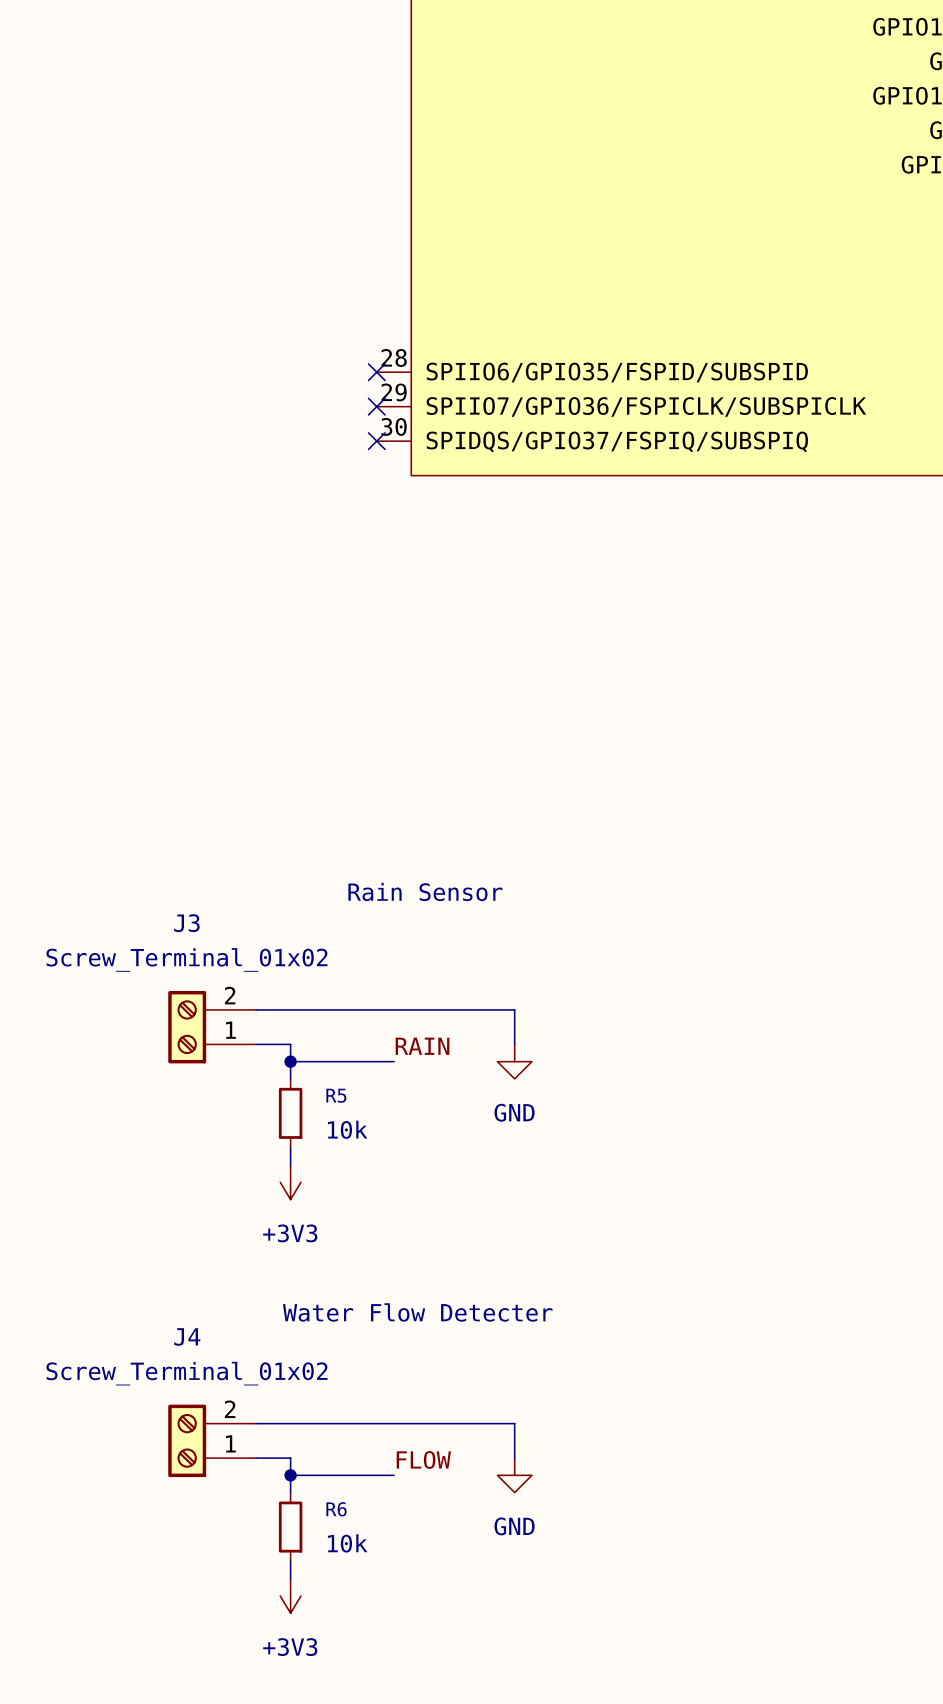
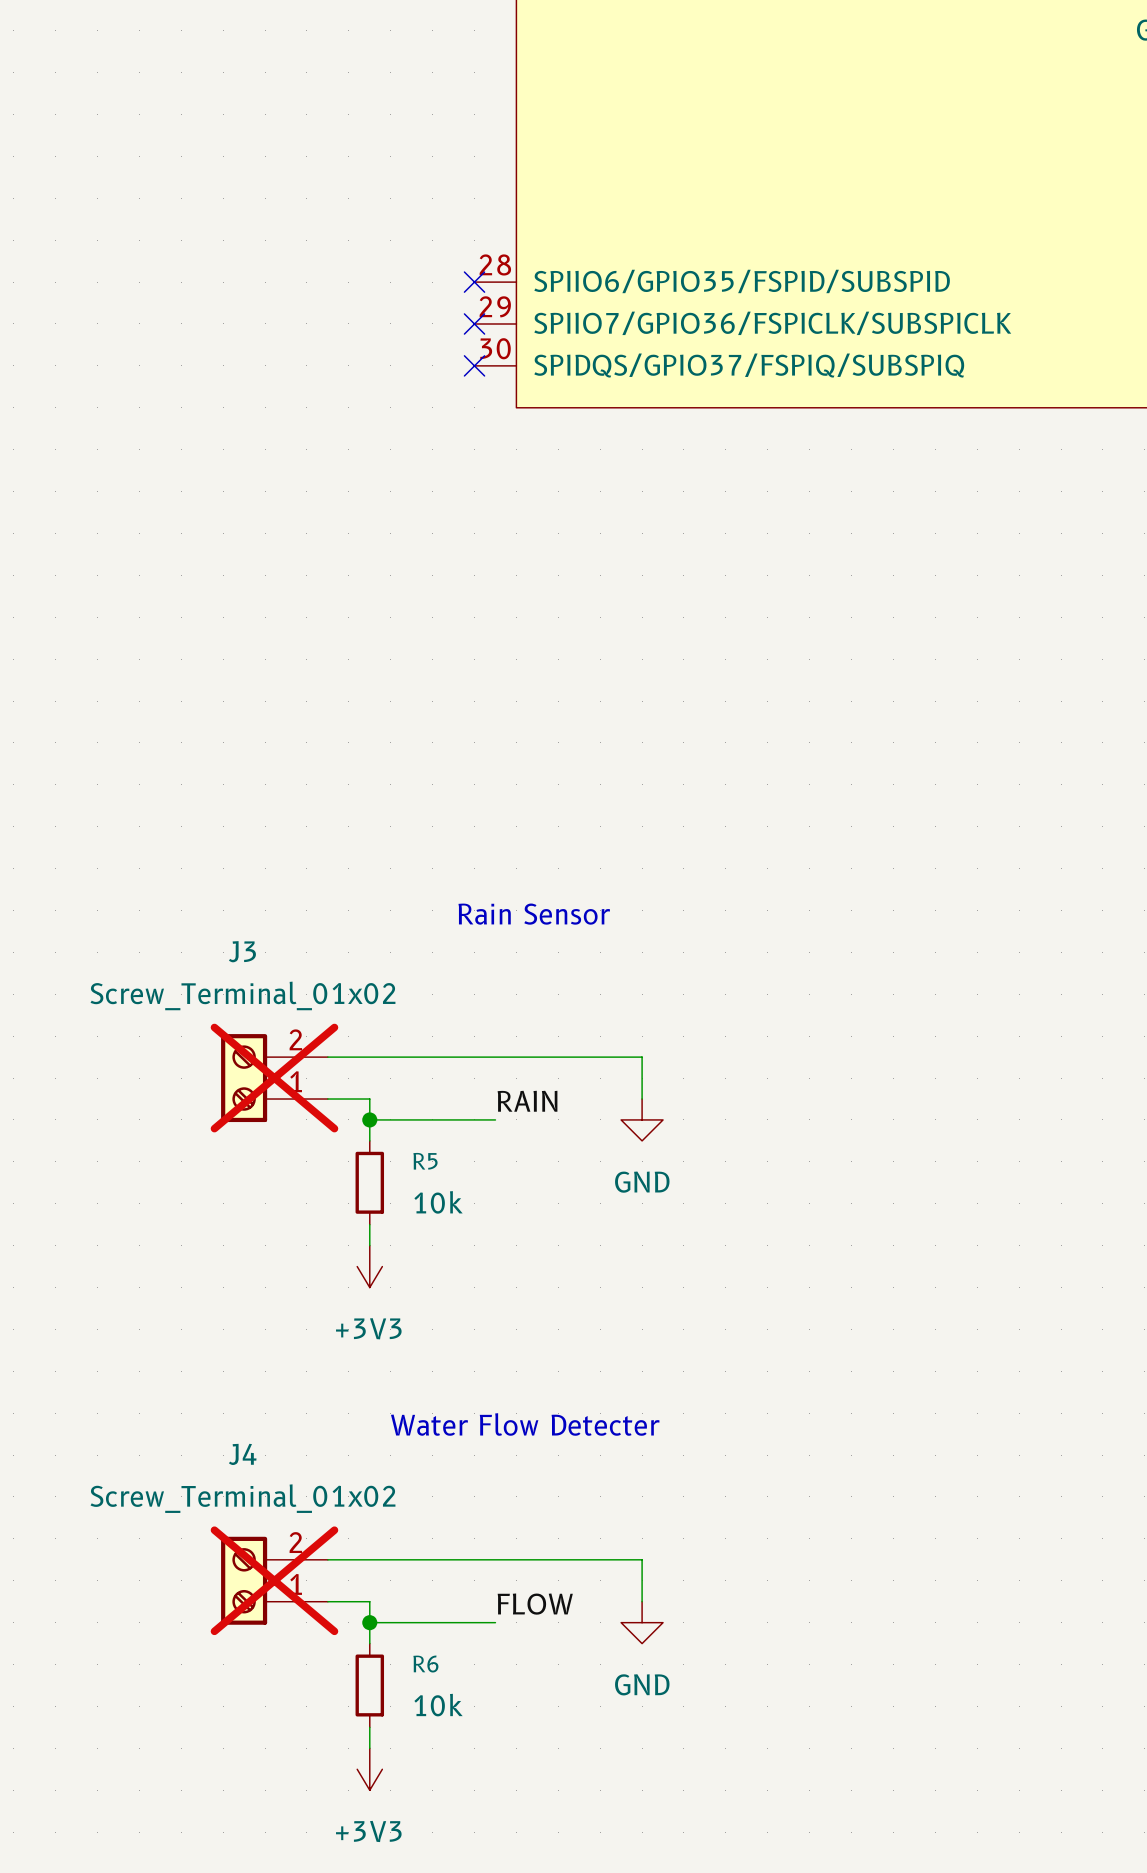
J3 do-not-place cross: none -> (274, 1078)
J4 do-not-place cross: none -> (274, 1580)

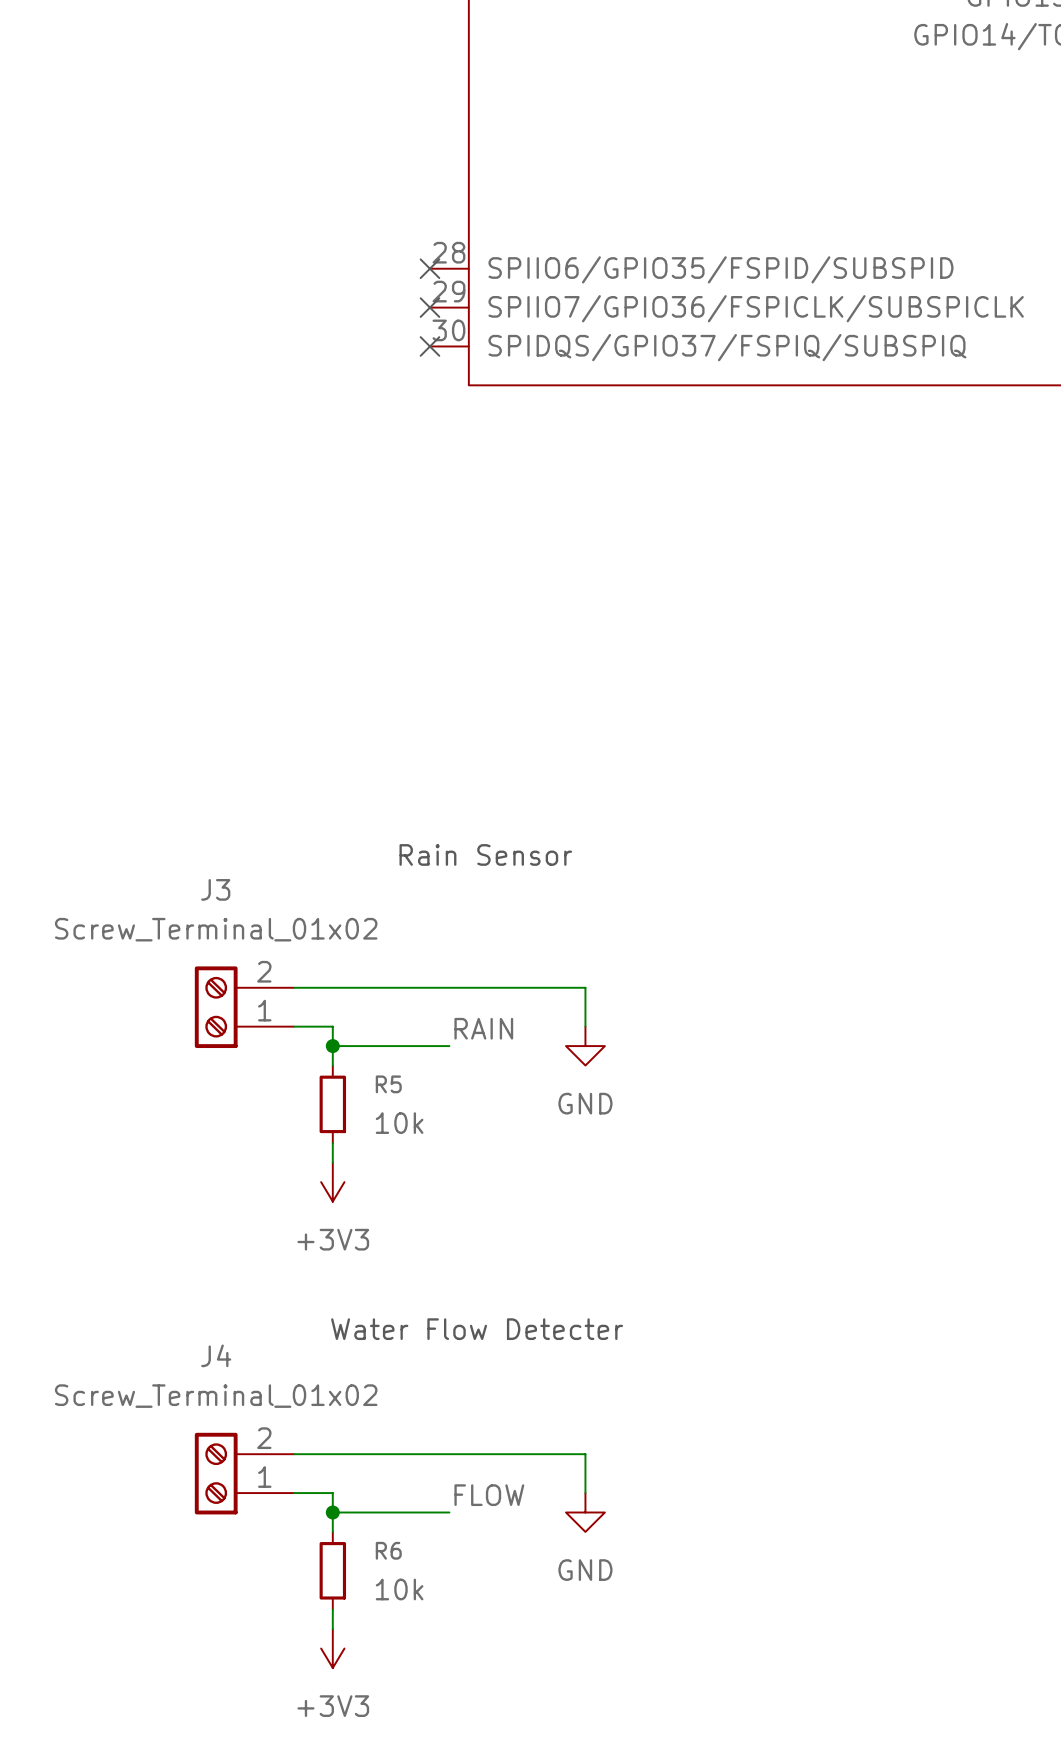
J3 do-not-place cross: (274, 1078) -> none
J4 do-not-place cross: (274, 1580) -> none

